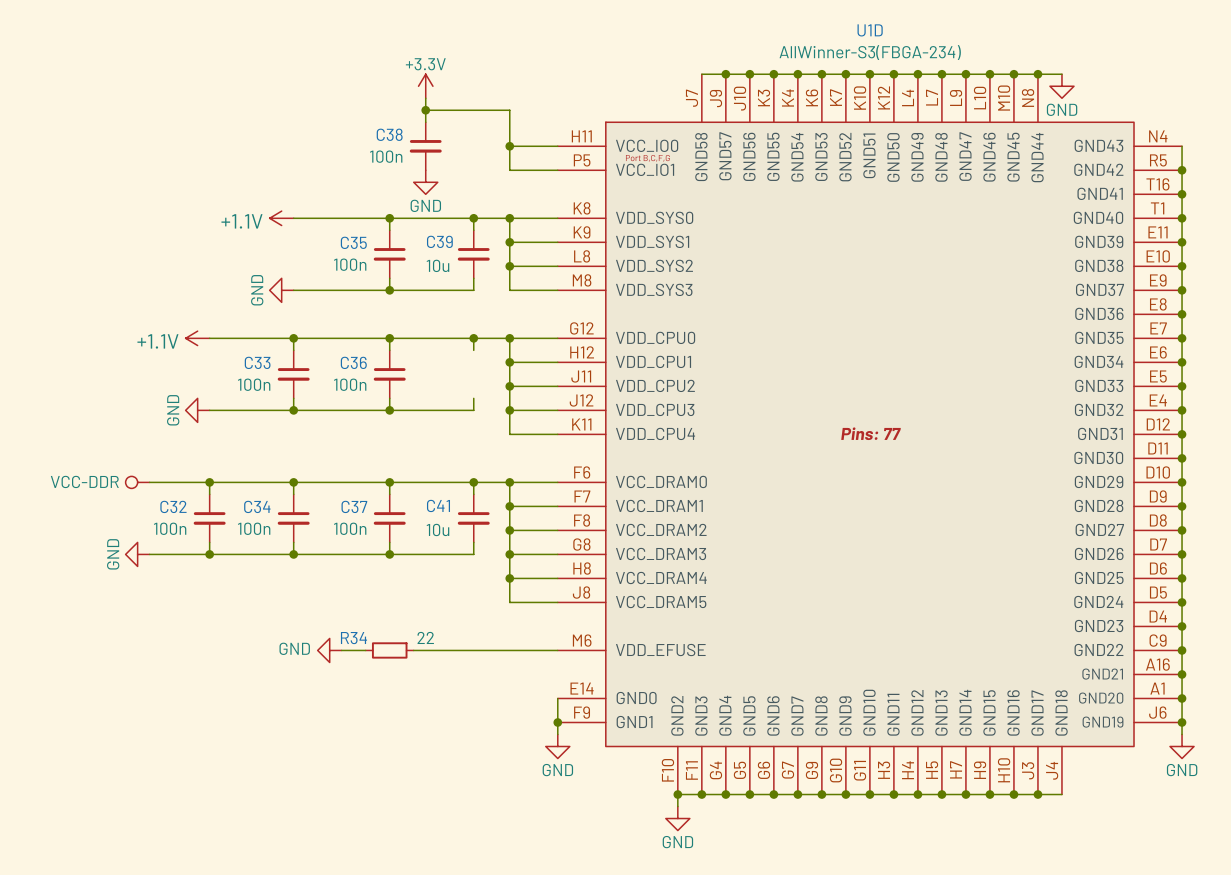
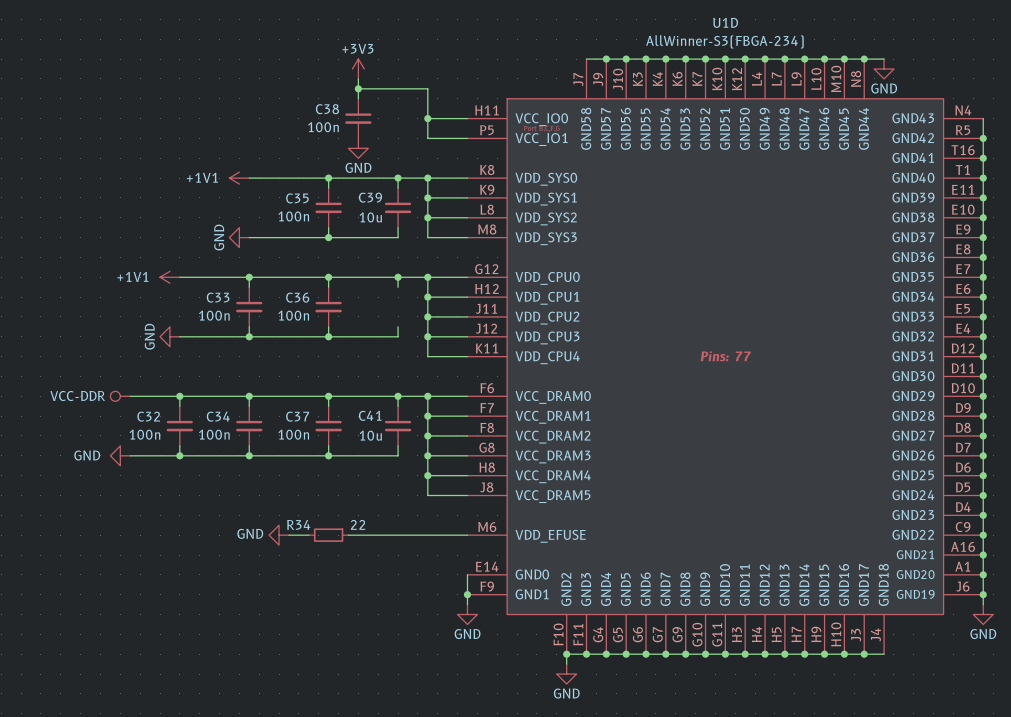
power symbol: +3.3V (425, 86) -> +3V3 (358, 69)
power symbol: +1.1V (281, 218) -> +1V1 (239, 178)
power symbol: +1.1V (197, 338) -> +1V1 (169, 277)
power symbol text rotation: 0° (113, 554) -> 90° clockwise (87, 455)

